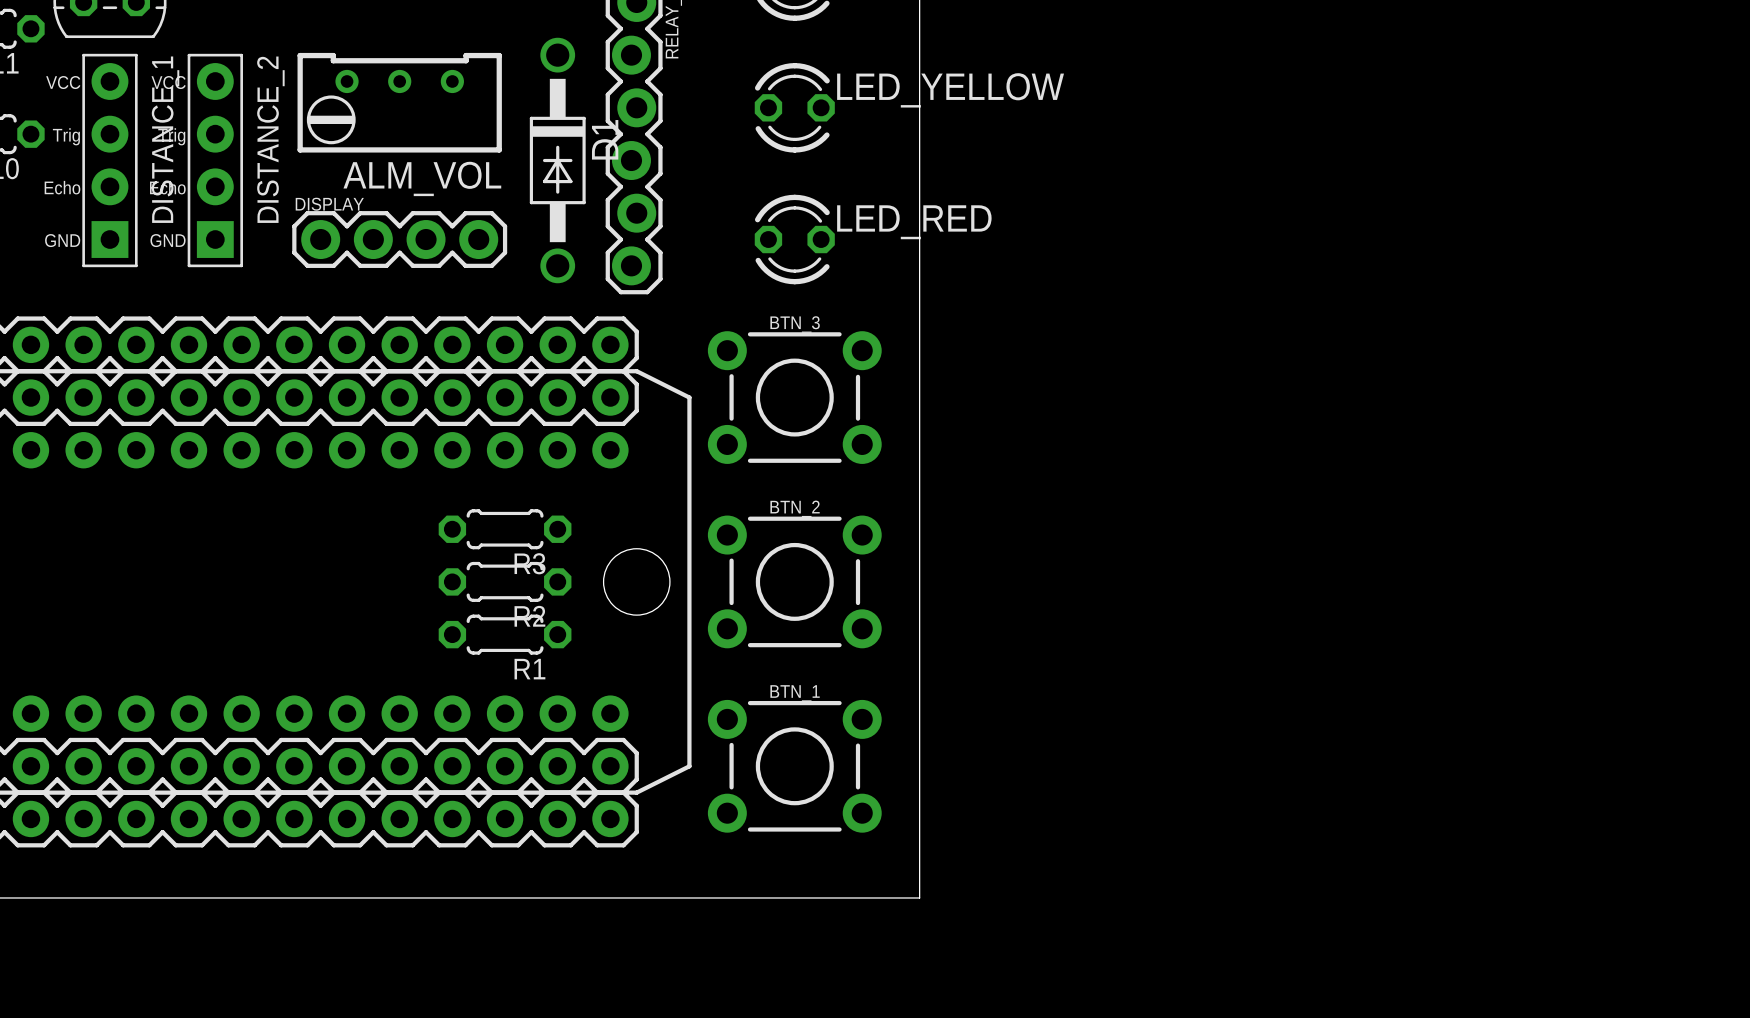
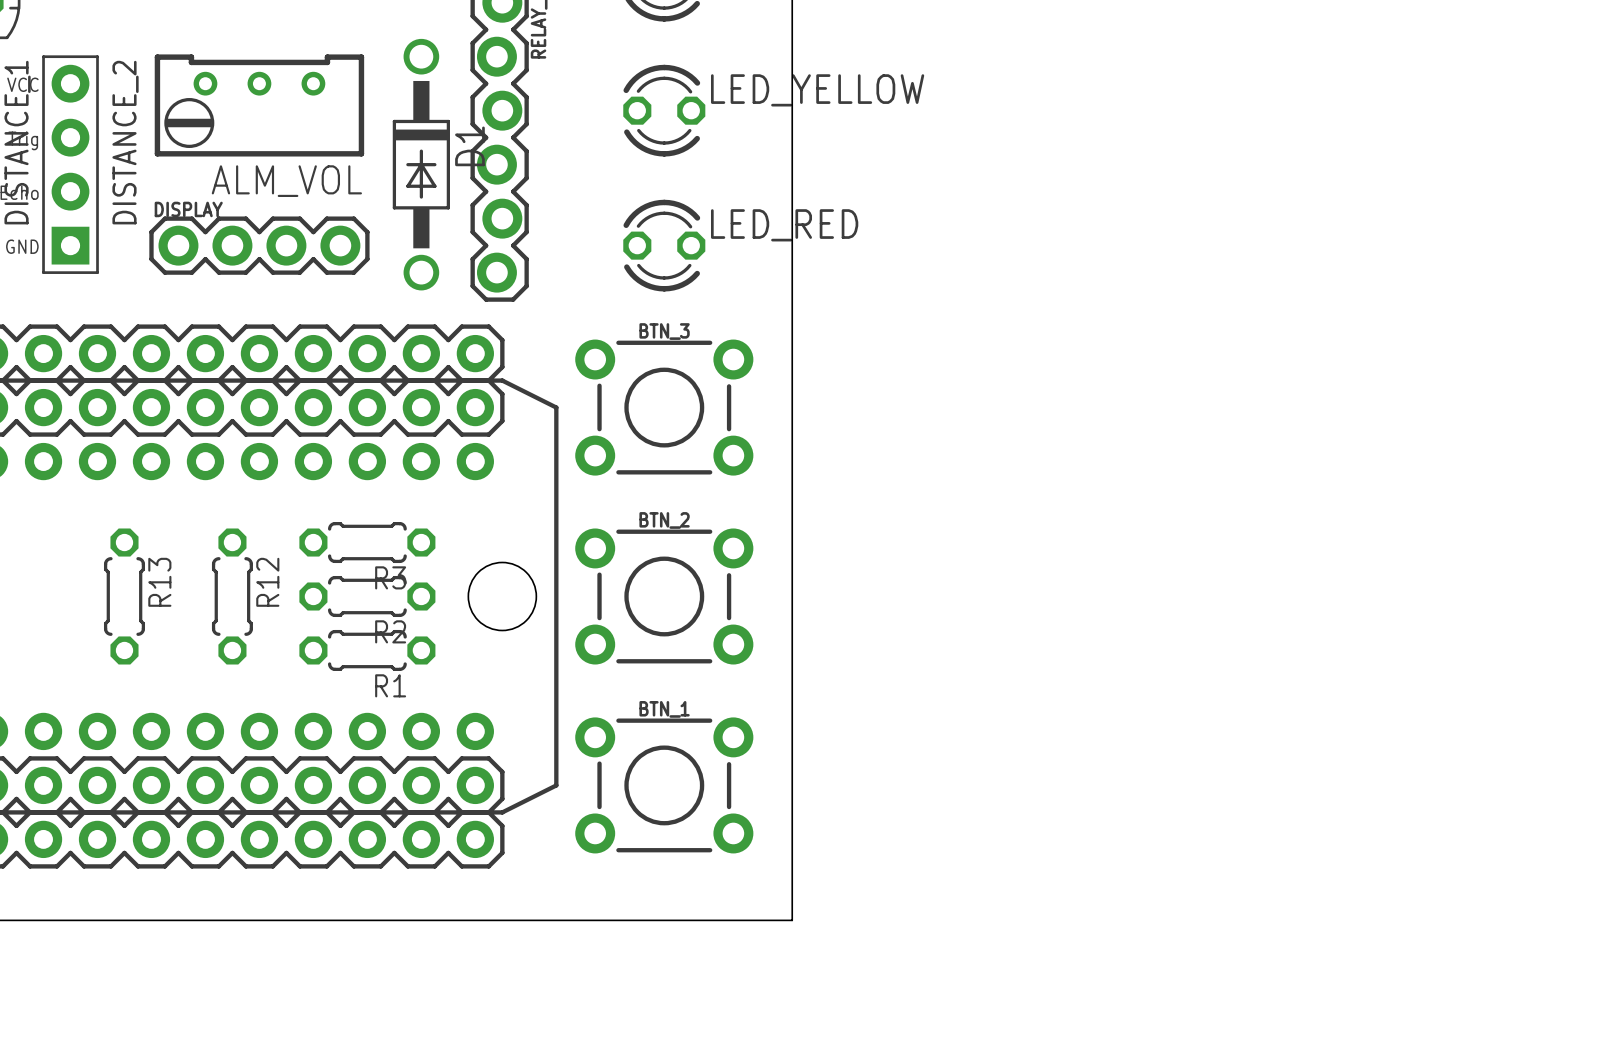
R13: none -> (124, 596)
R12: none -> (232, 596)

